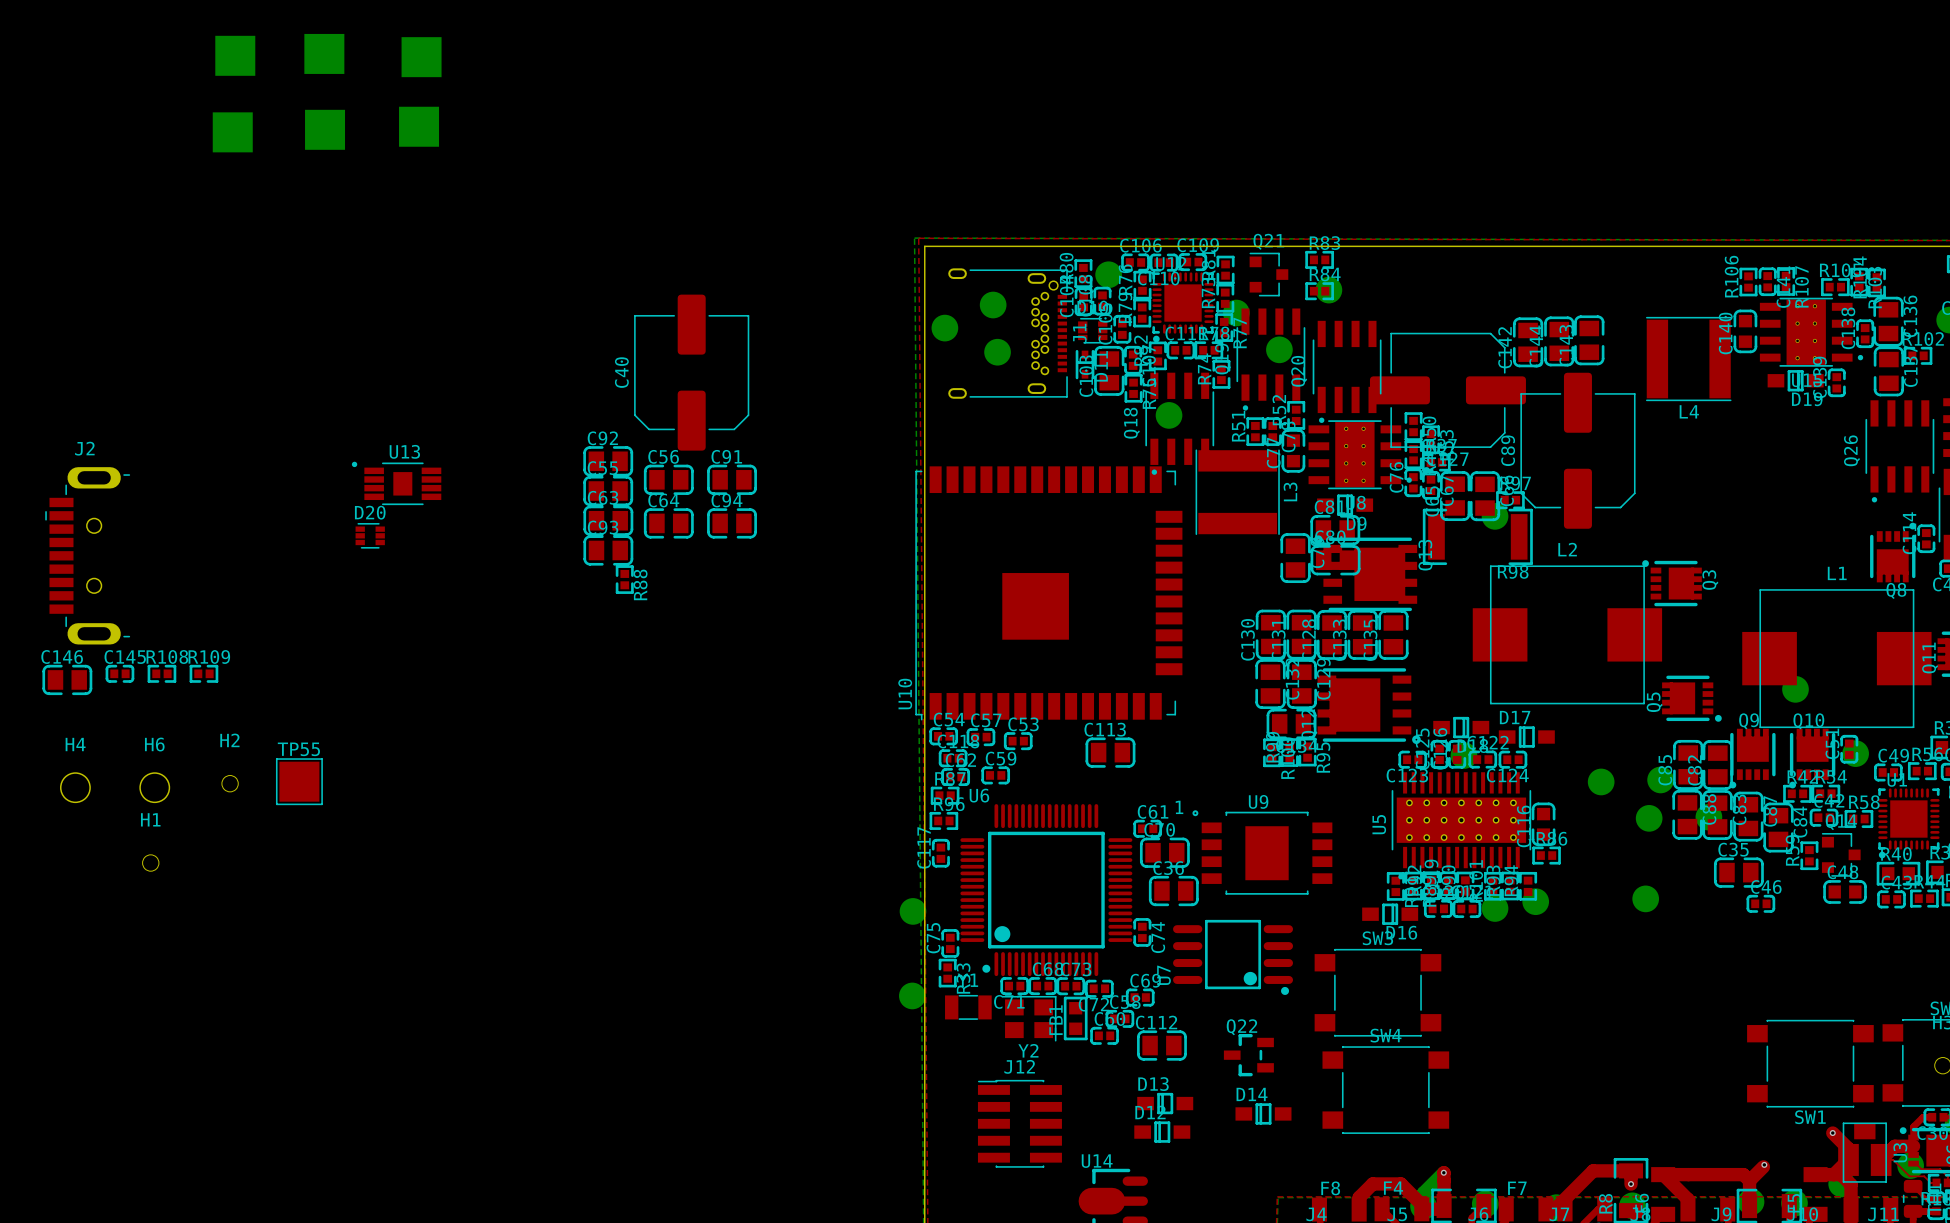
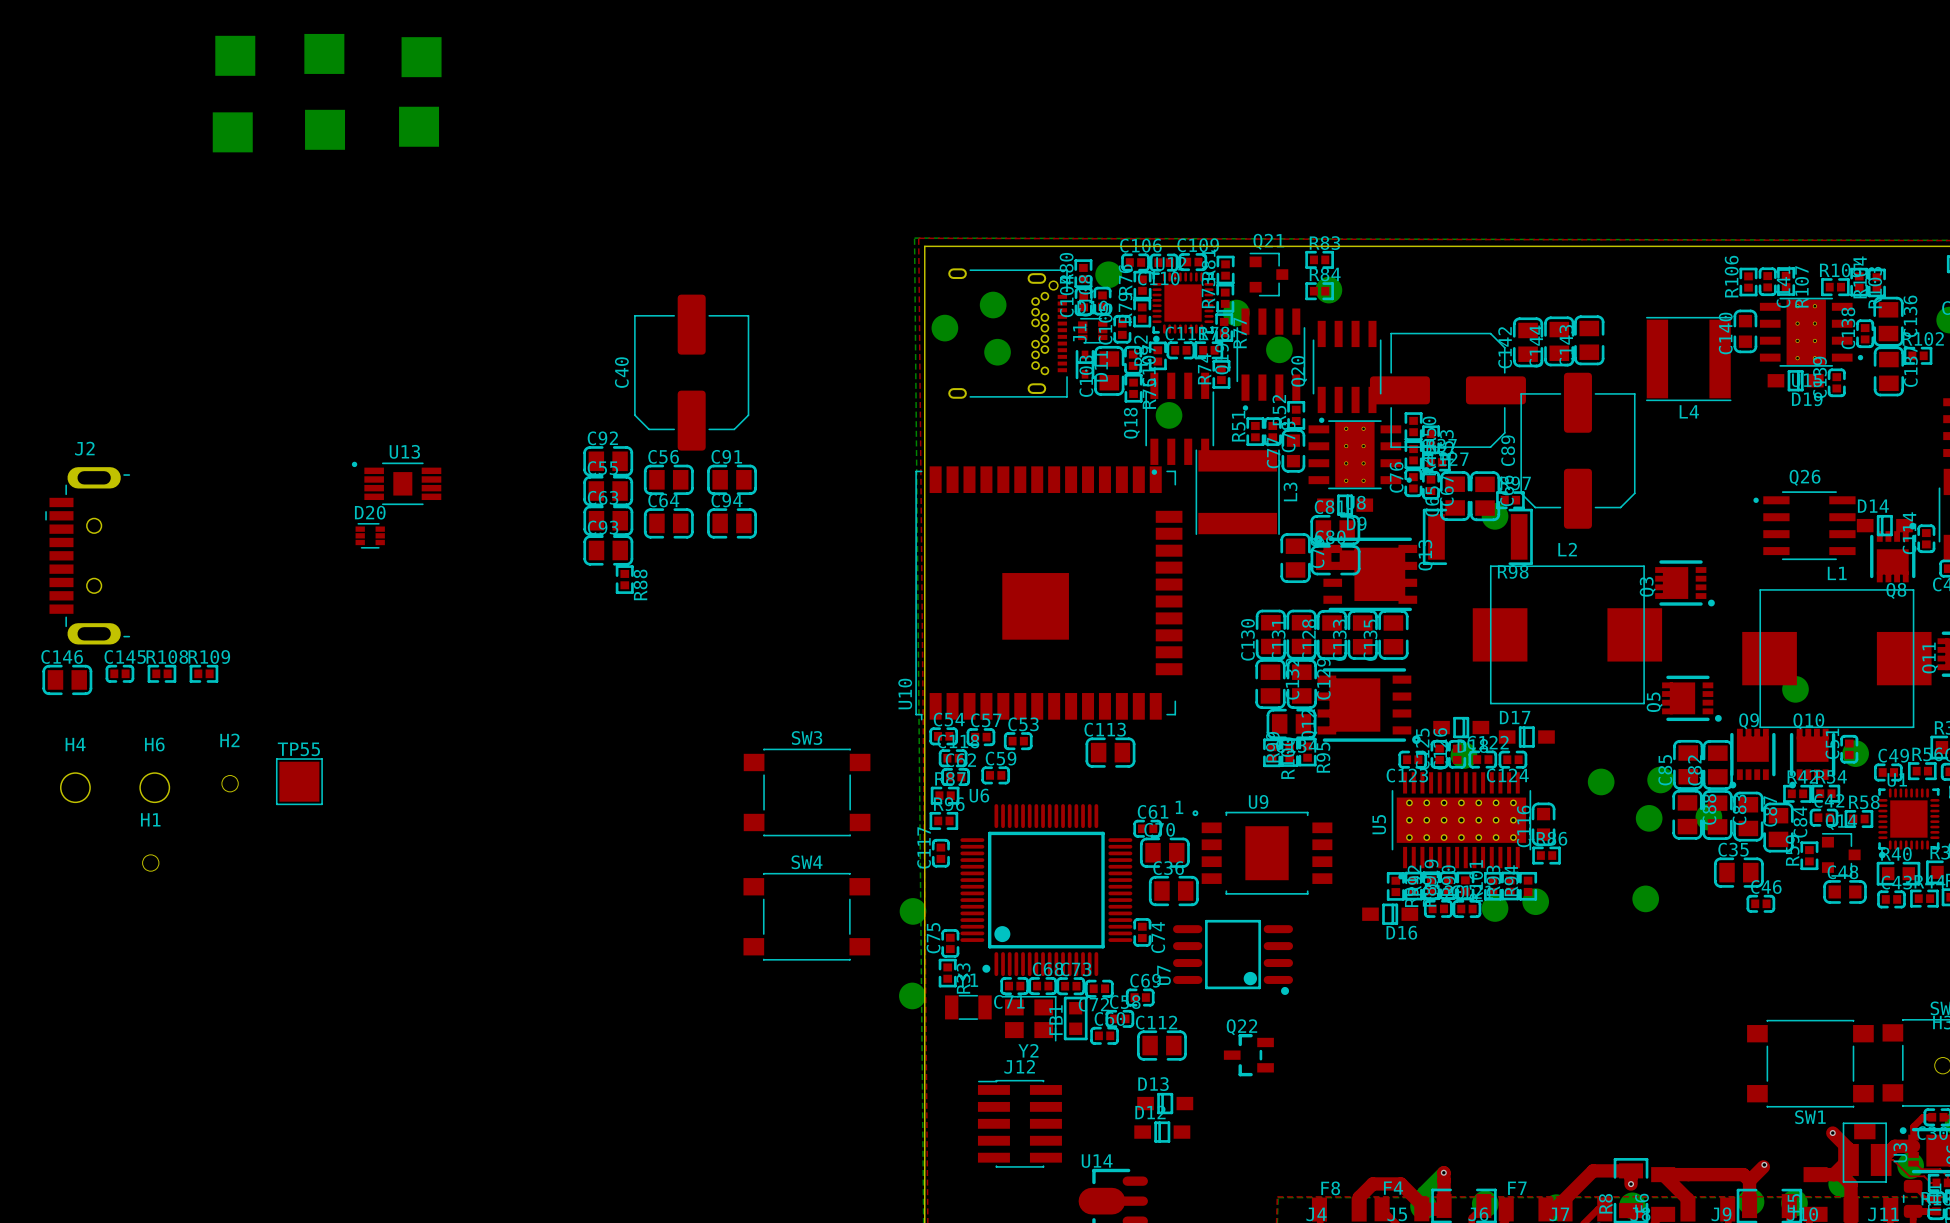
Q26 rotation: 0° (1899, 451) -> 90° clockwise (1804, 525)
Q26 position: (1899, 451) -> (1804, 525)
Q3 rotation: 0° (1672, 583) -> 180° (1684, 583)
SW3 position: (1377, 992) -> (807, 792)
SW4 position: (1385, 1090) -> (806, 916)
D14 position: (1263, 1113) -> (1884, 525)

